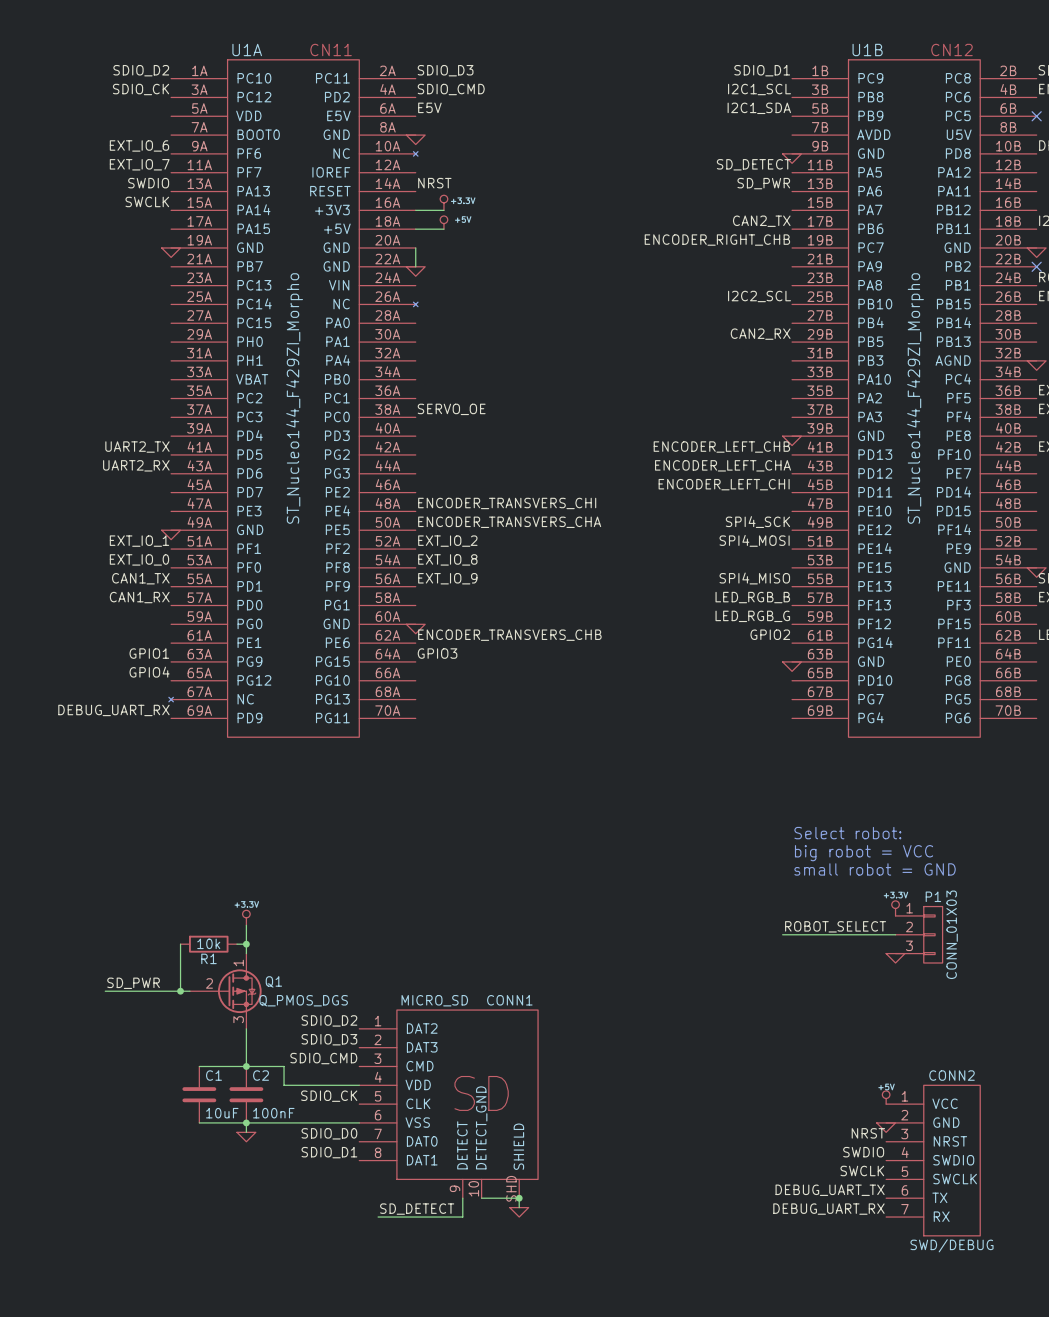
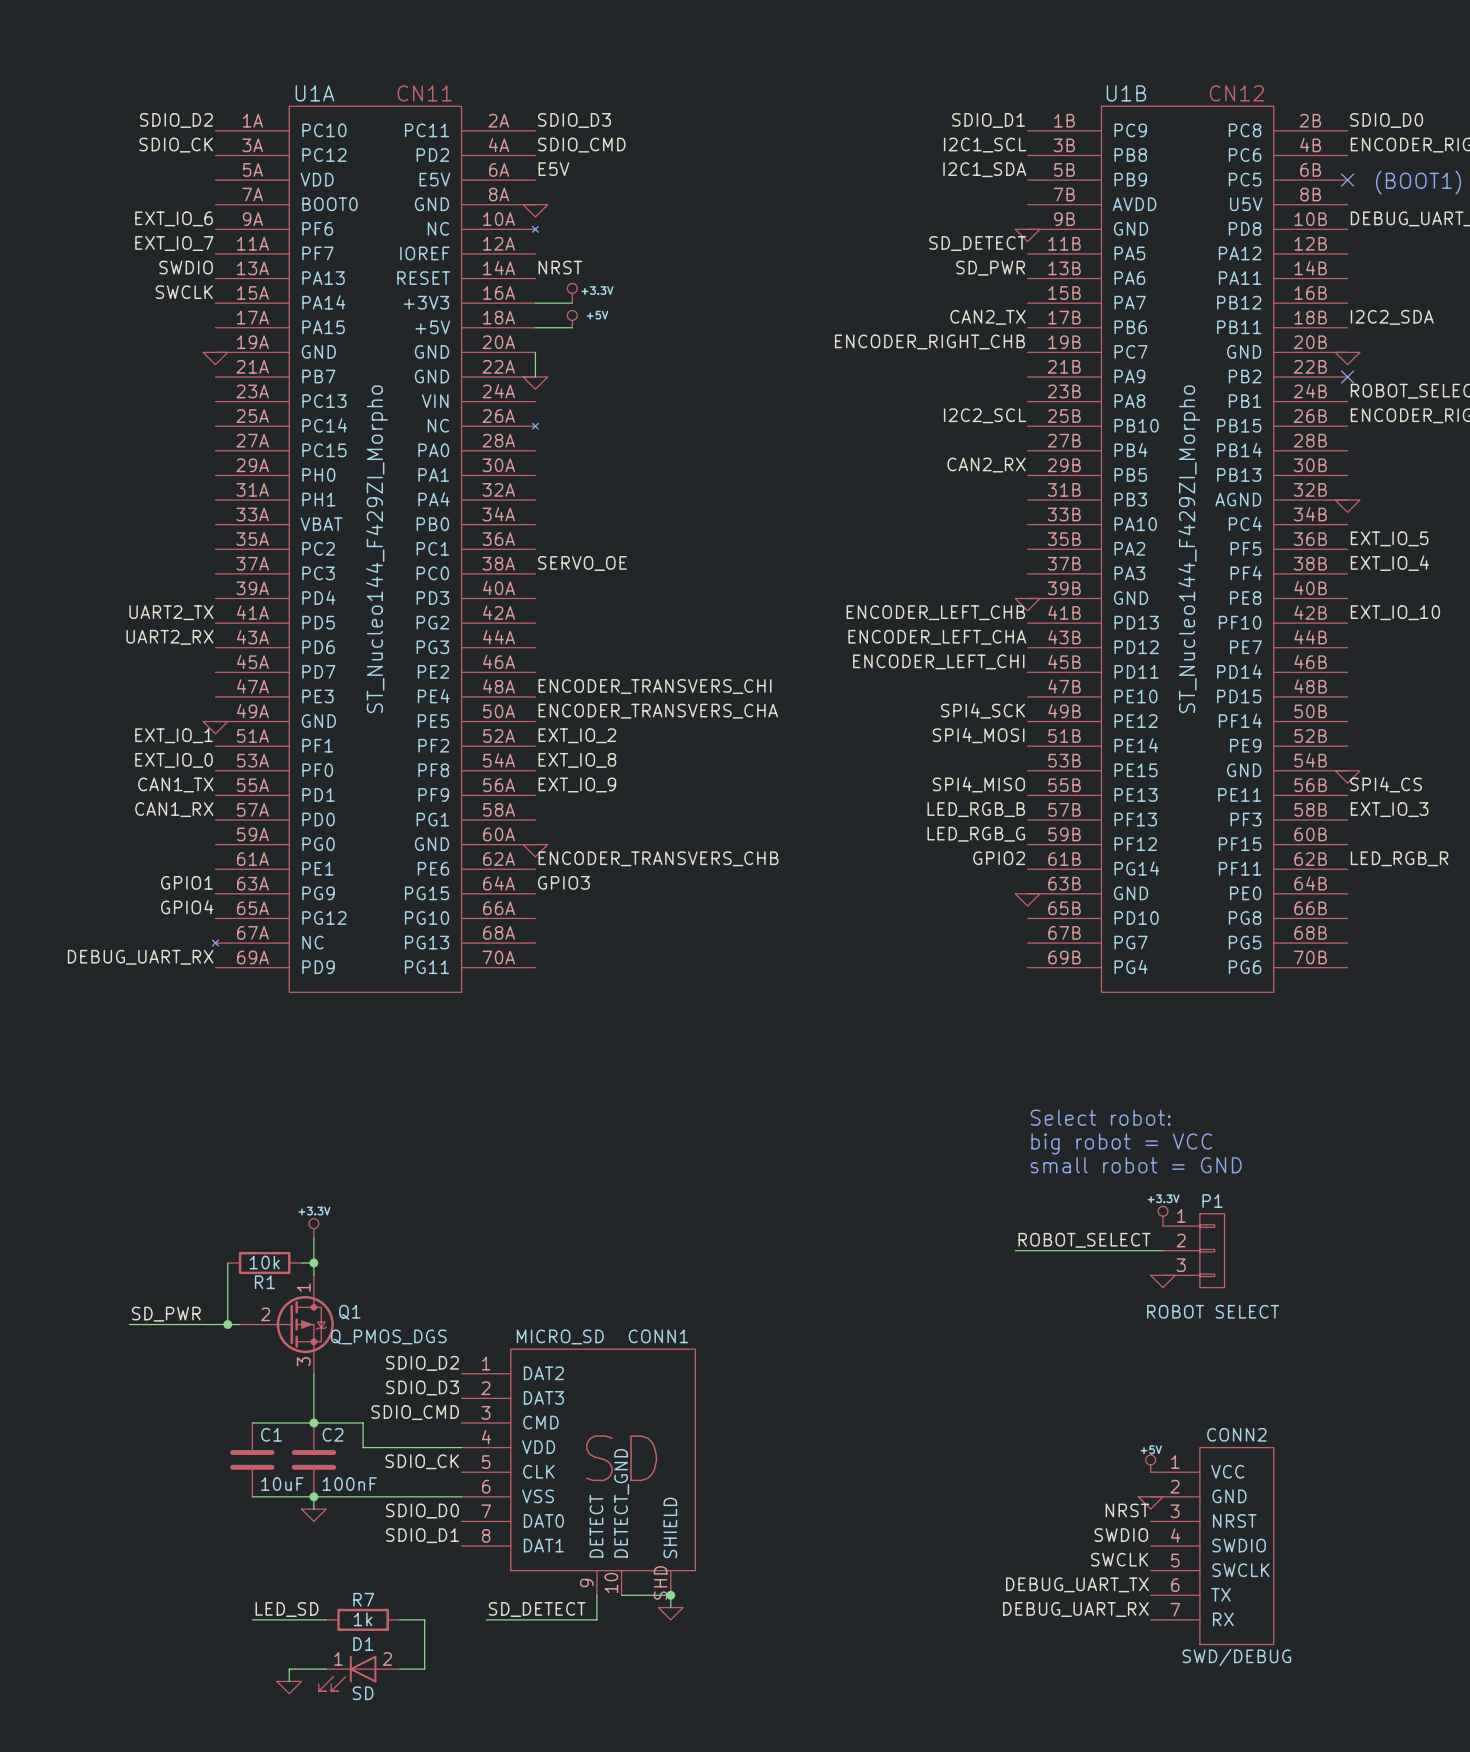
P1 value: CONN_01X03 (952, 934) -> ROBOT SELECT (1213, 1311)
label: none -> LED_SD (287, 1609)
wire: none -> (252, 1619) (326, 1619)
R7: none -> 1k (363, 1619)
wire: none -> (400, 1619) (424, 1619) (424, 1669) (400, 1669)
wire: none -> (326, 1669) (289, 1669) (289, 1681)
D1: none -> SD (359, 1673)
power symbol: none -> (289, 1687)

